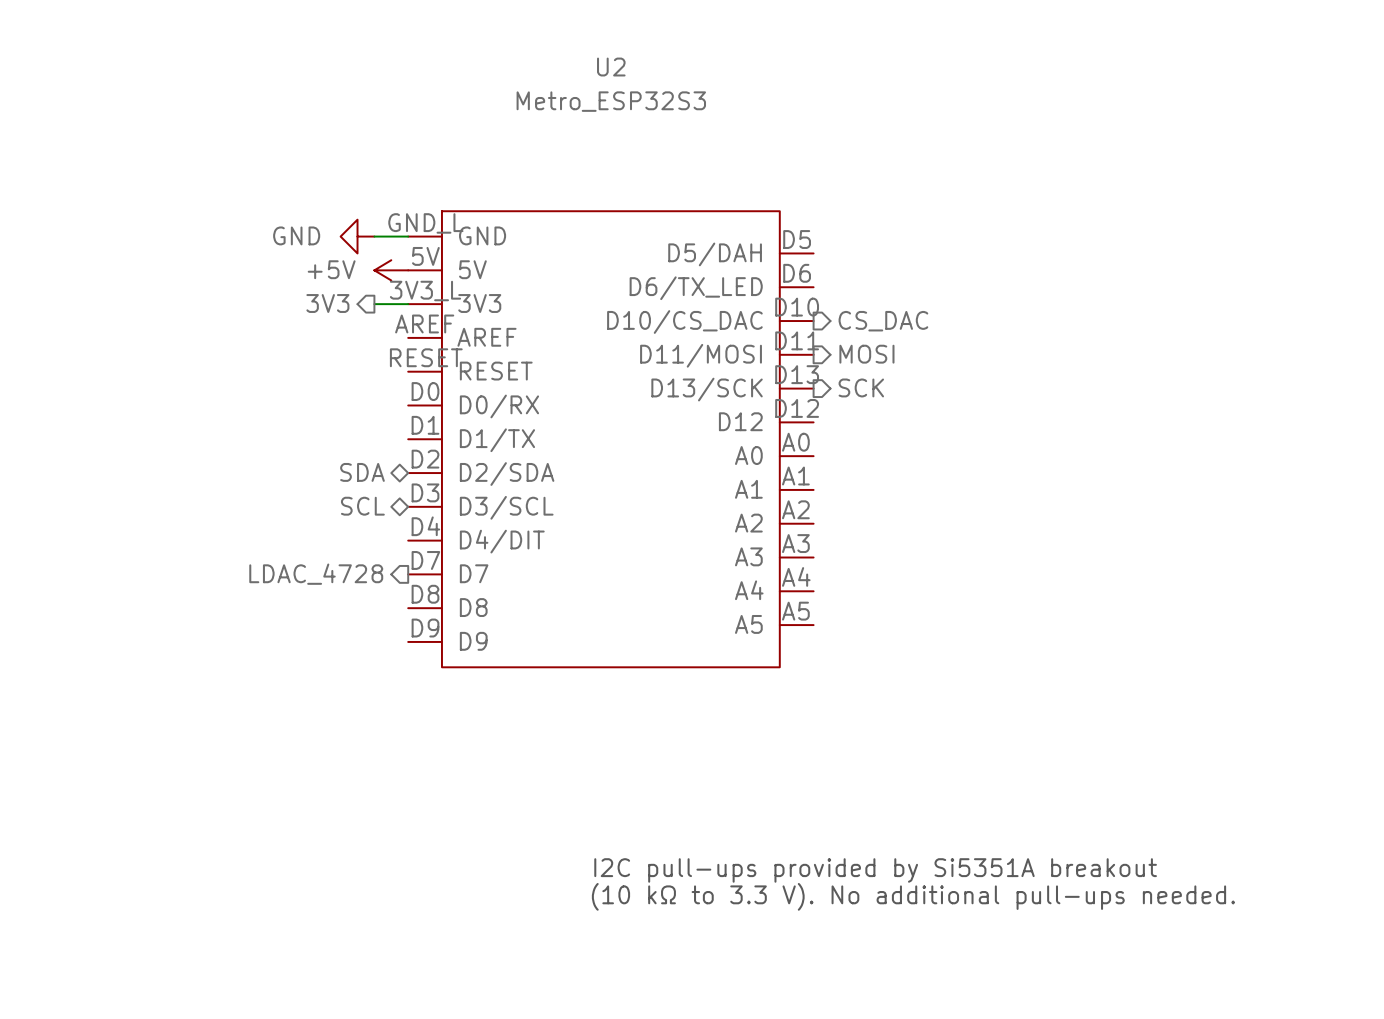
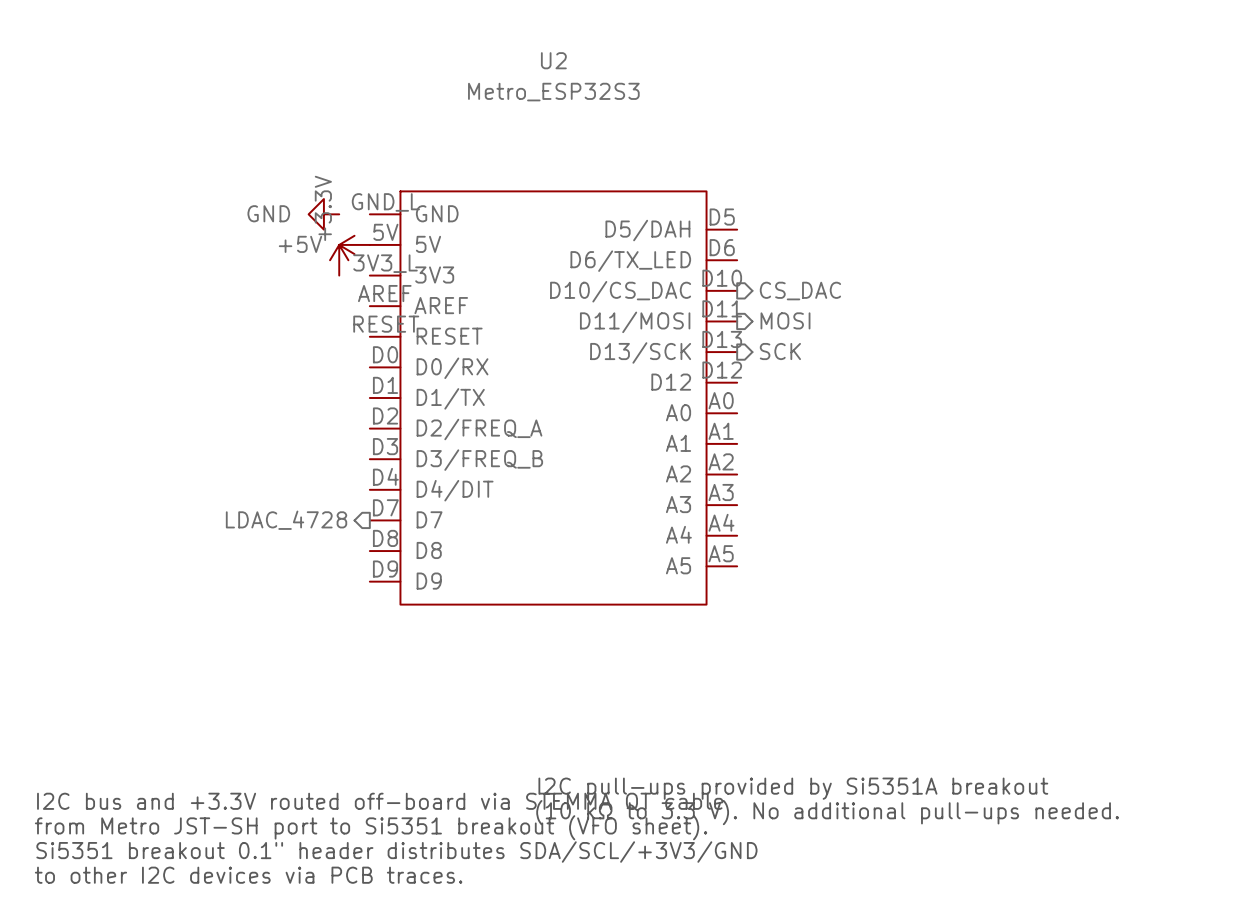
wire: (374, 236) (408, 236) -> none
power symbol: none -> +3.3V (339, 260)
hierarchical label: 3V3 (327, 303) -> none
wire: (374, 304) (408, 304) -> none
hierarchical label: SDA (362, 472) -> none
U2 pin name: D2/SDA (507, 474) -> D2/FREQ_A (479, 429)
hierarchical label: SCL (362, 506) -> none
U2 pin name: D3/SCL (506, 507) -> D3/FREQ_B (479, 460)
text: none -> I2C bus and +3.3V routed off-board via STEMMA QT cable (380, 802)
text: none -> from Metro JST-SH port to Si5351 breakout (VFO sheet). (371, 827)
text: none -> Si5351 breakout 0.1" header distributes SDA/SCL/+3V3/GND (396, 852)
text: none -> to other I2C devices via PCB traces. (248, 875)

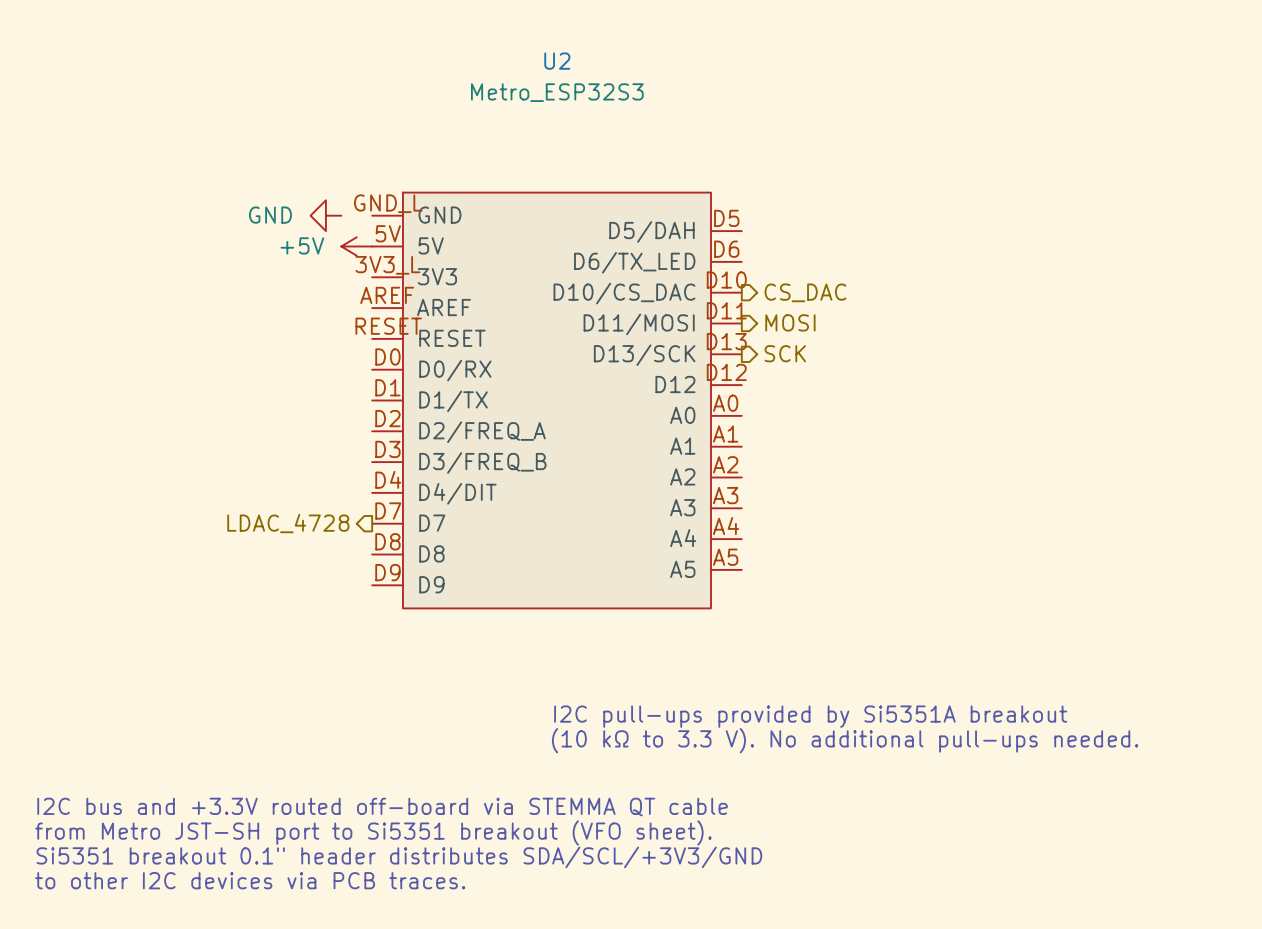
power symbol: +3.3V (339, 260) -> none
text position: I2C pull-ups provided by Si5351A breakout (793, 788) -> I2C pull-ups provided by Si5351A breakout (810, 716)
text position: (10 kΩ to 3.3 V). No additional pull-ups needed. (827, 812) -> (10 kΩ to 3.3 V). No additional pull-ups needed. (845, 740)

